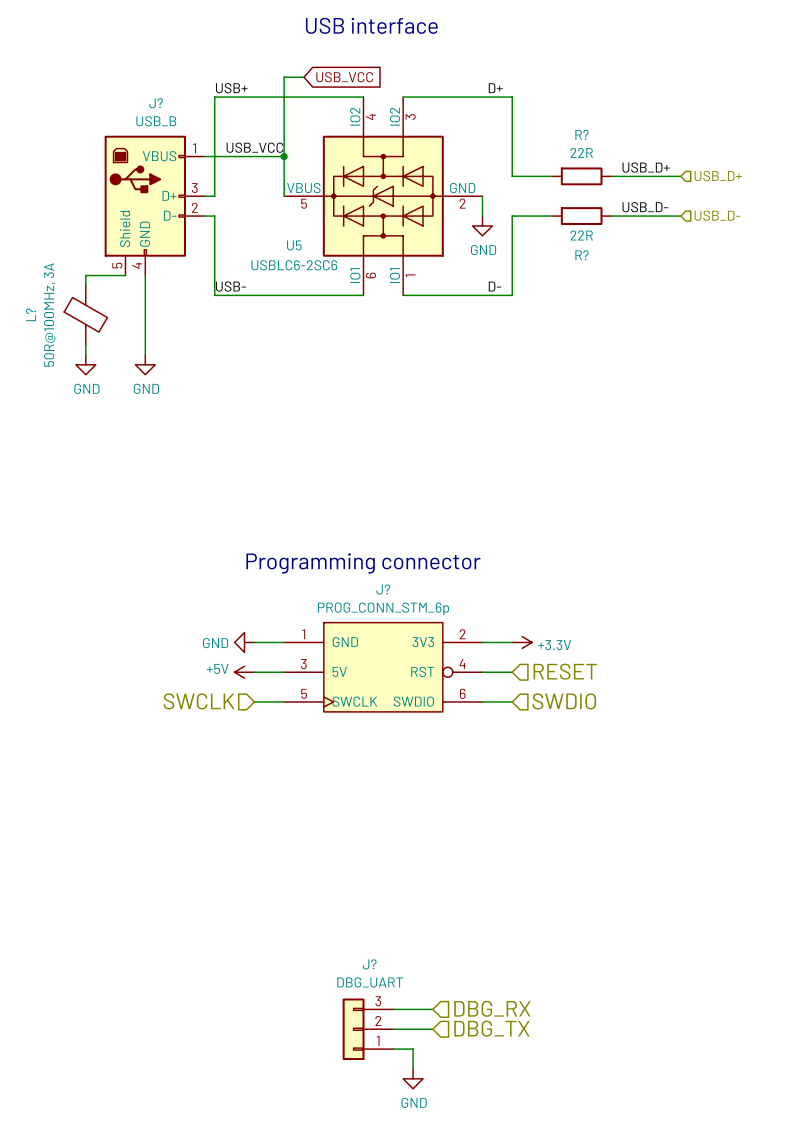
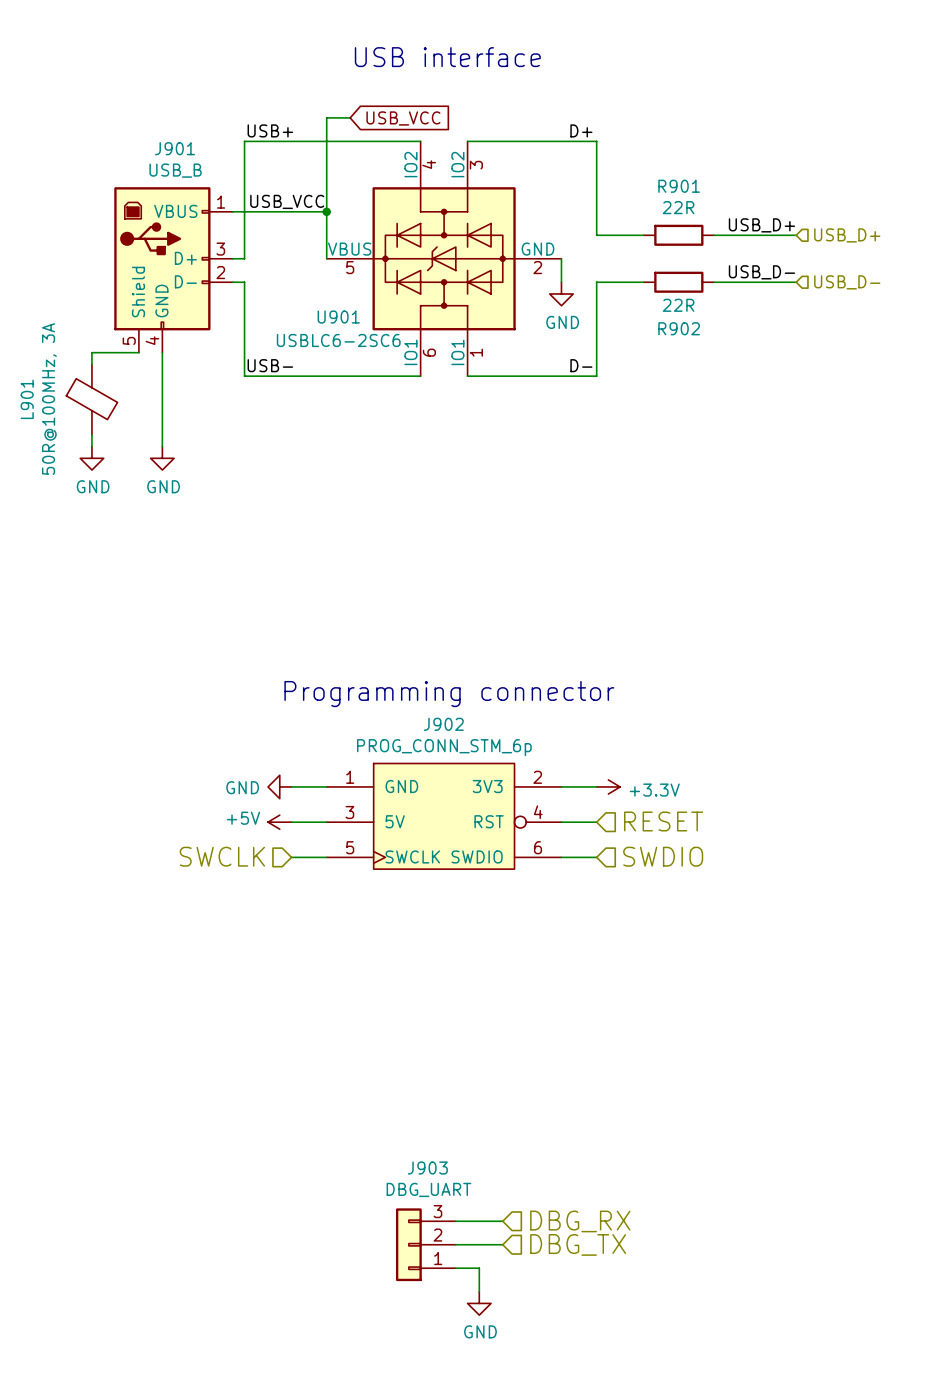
J? name: J? (156, 103) -> J901 (175, 148)
R? name: R? (582, 134) -> R901 (679, 186)
U5 name: U5 (294, 245) -> U901 (338, 317)
R? name: R? (582, 255) -> R902 (679, 328)
L? name: L? (31, 314) -> L901 (27, 399)
J? name: J? (383, 589) -> J902 (443, 724)
J? name: J? (369, 964) -> J903 (427, 1168)

